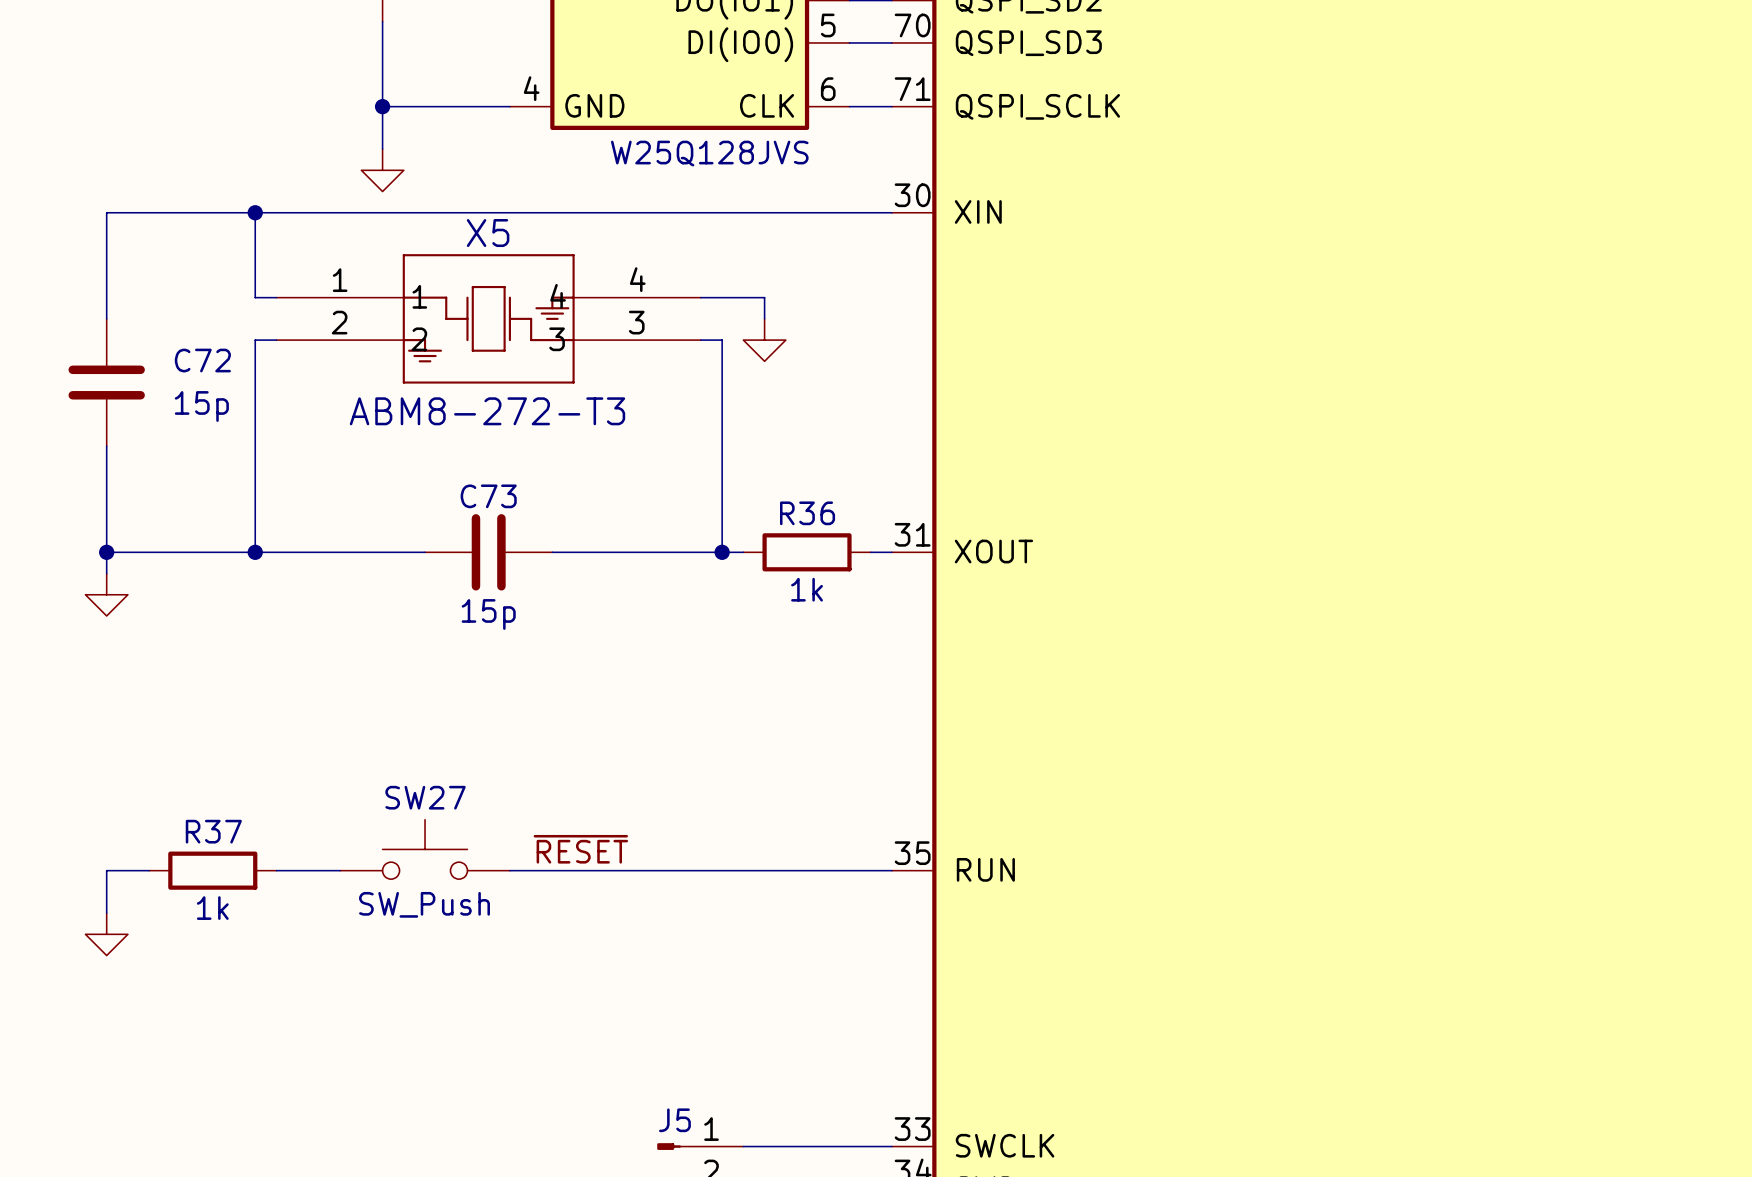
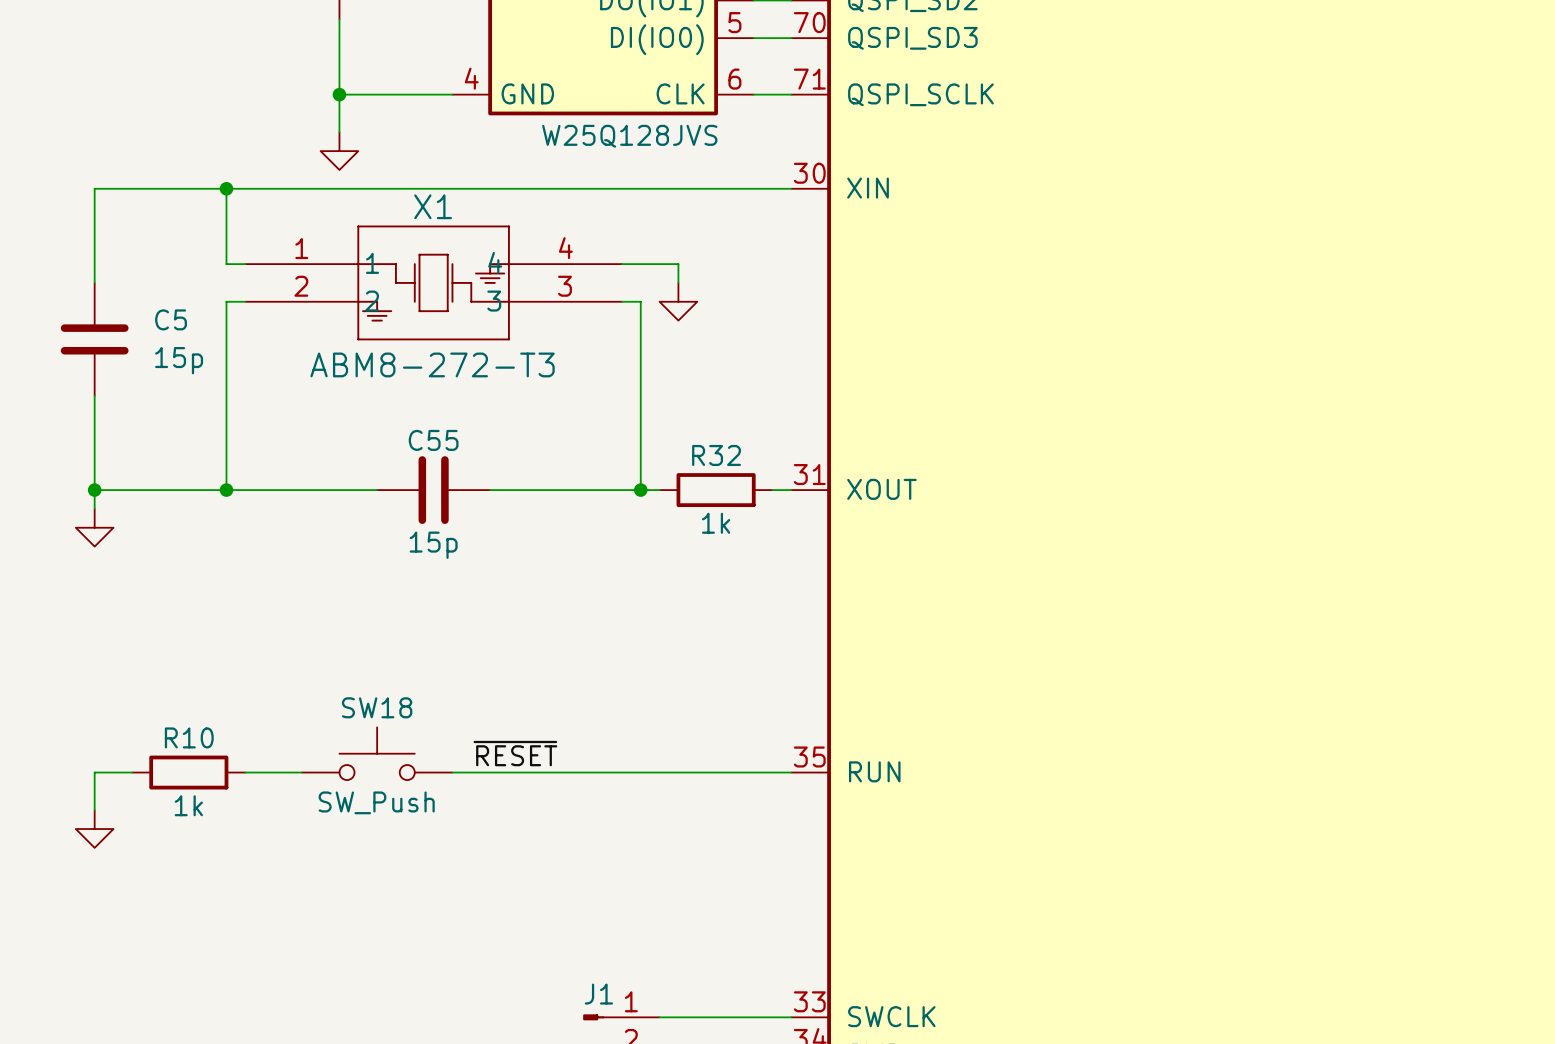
X5 name: X5 (488, 233) -> X1 (433, 206)
C72 name: C72 (202, 360) -> C5 (171, 319)
C73 name: C73 (488, 496) -> C55 (433, 440)
R36 name: R36 (807, 513) -> R32 (716, 455)
SW27 name: SW27 (425, 797) -> SW18 (377, 707)
R37 name: R37 (213, 831) -> R10 (189, 737)
J5 name: J5 (674, 1120) -> J1 (598, 994)

